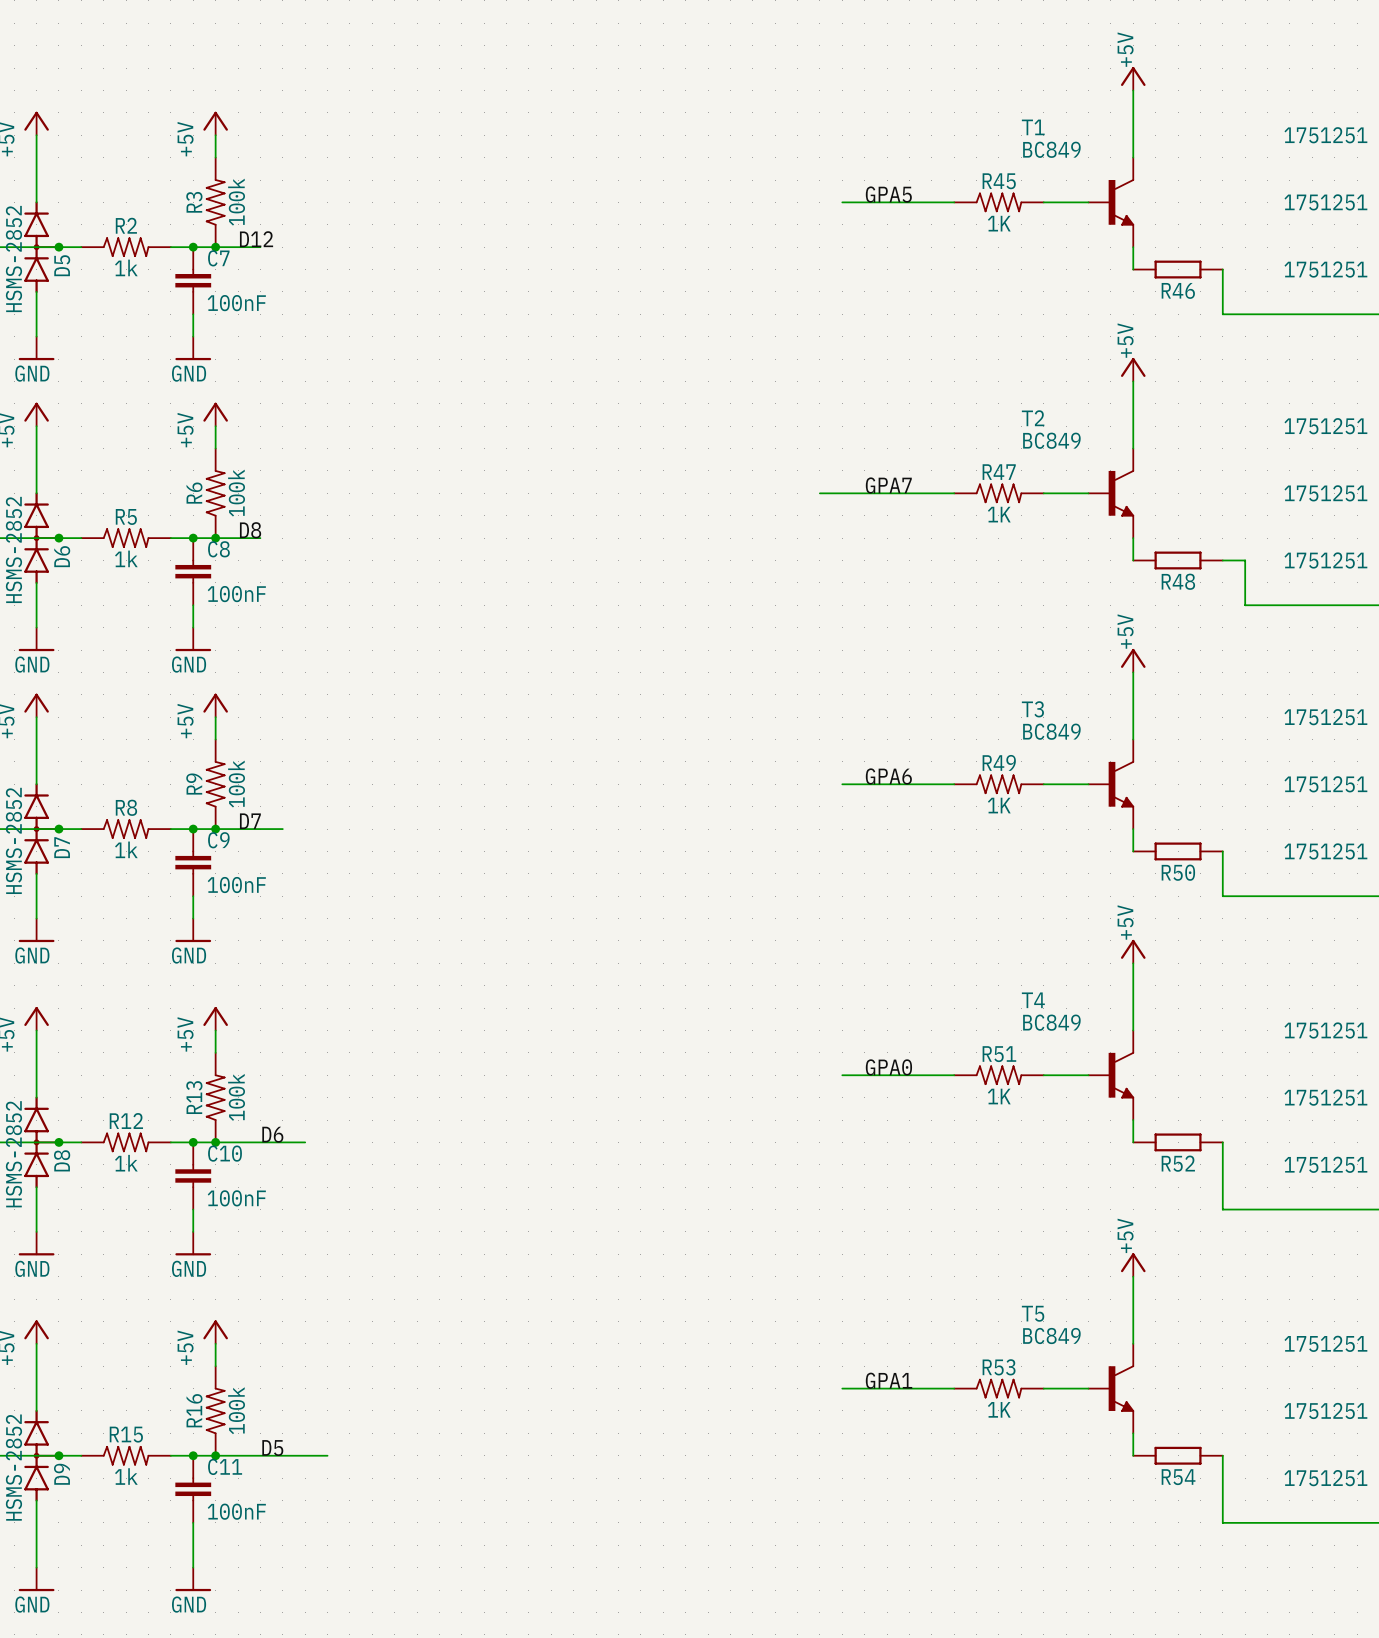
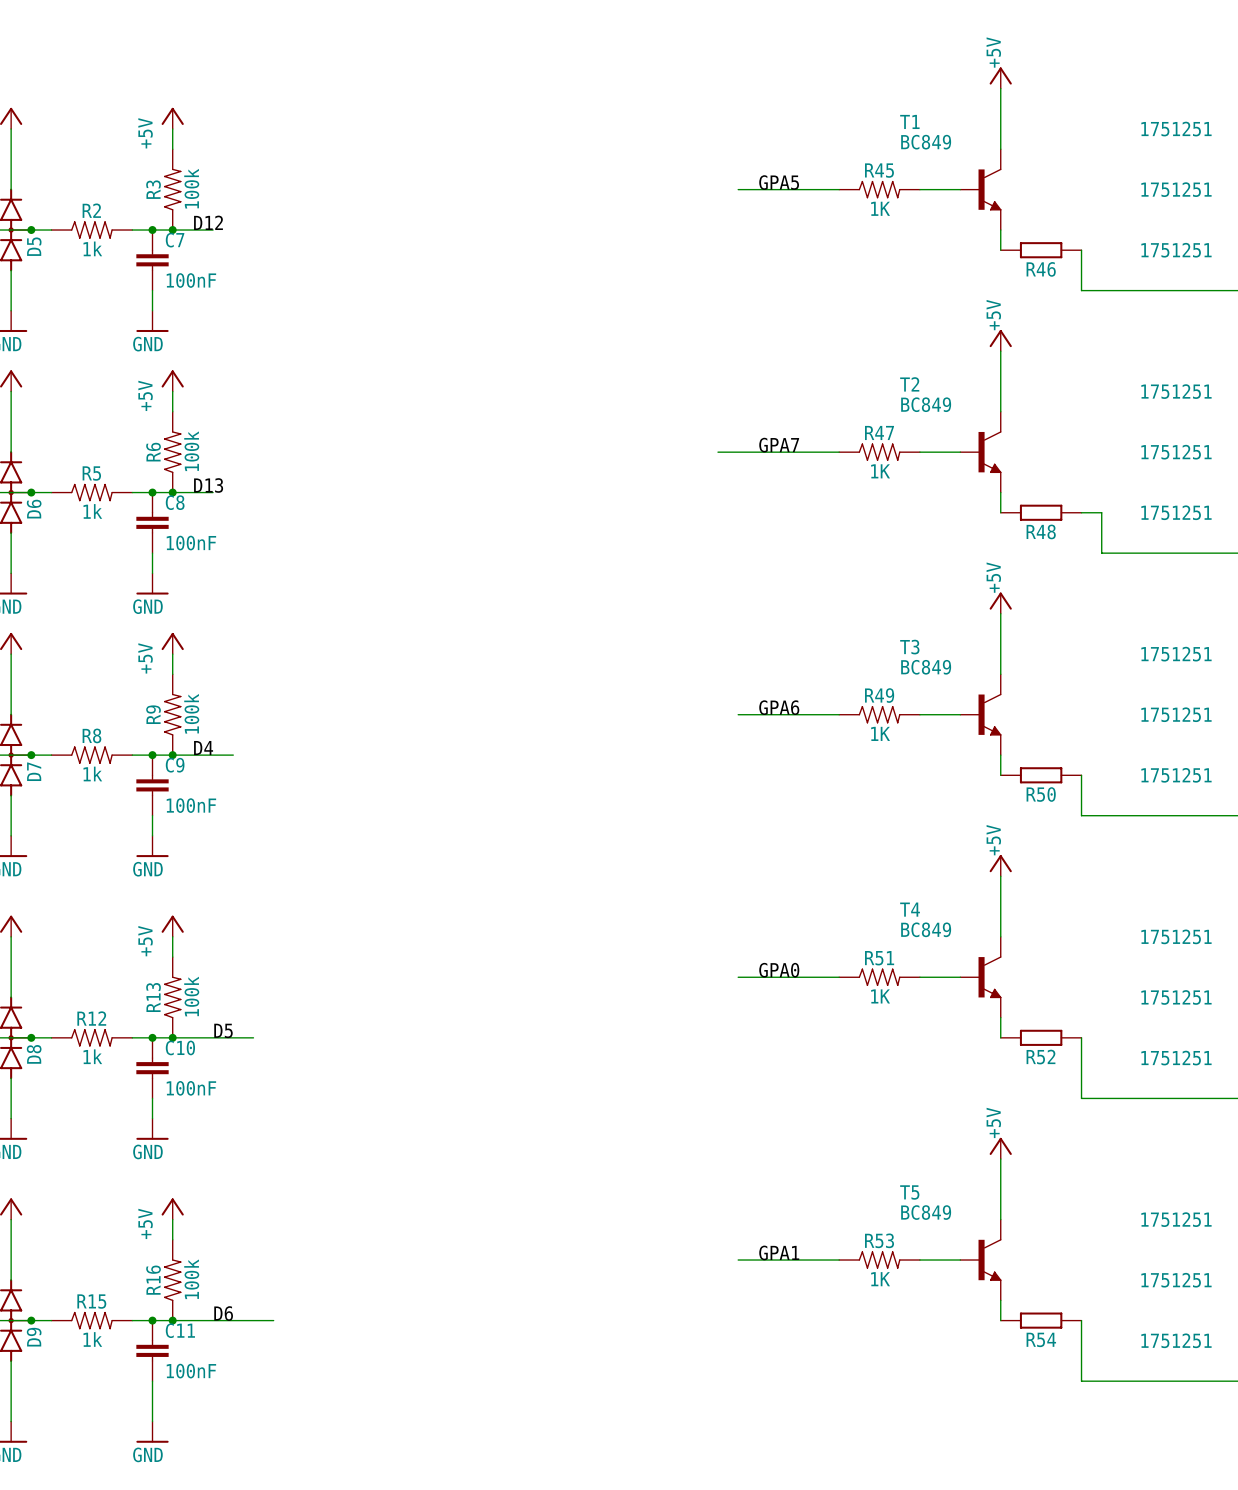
label: D8 (250, 530) -> D13 (208, 485)
label: D7 (250, 821) -> D4 (203, 748)
label: D6 (272, 1134) -> D5 (223, 1030)
label: D5 (272, 1448) -> D6 (223, 1313)

